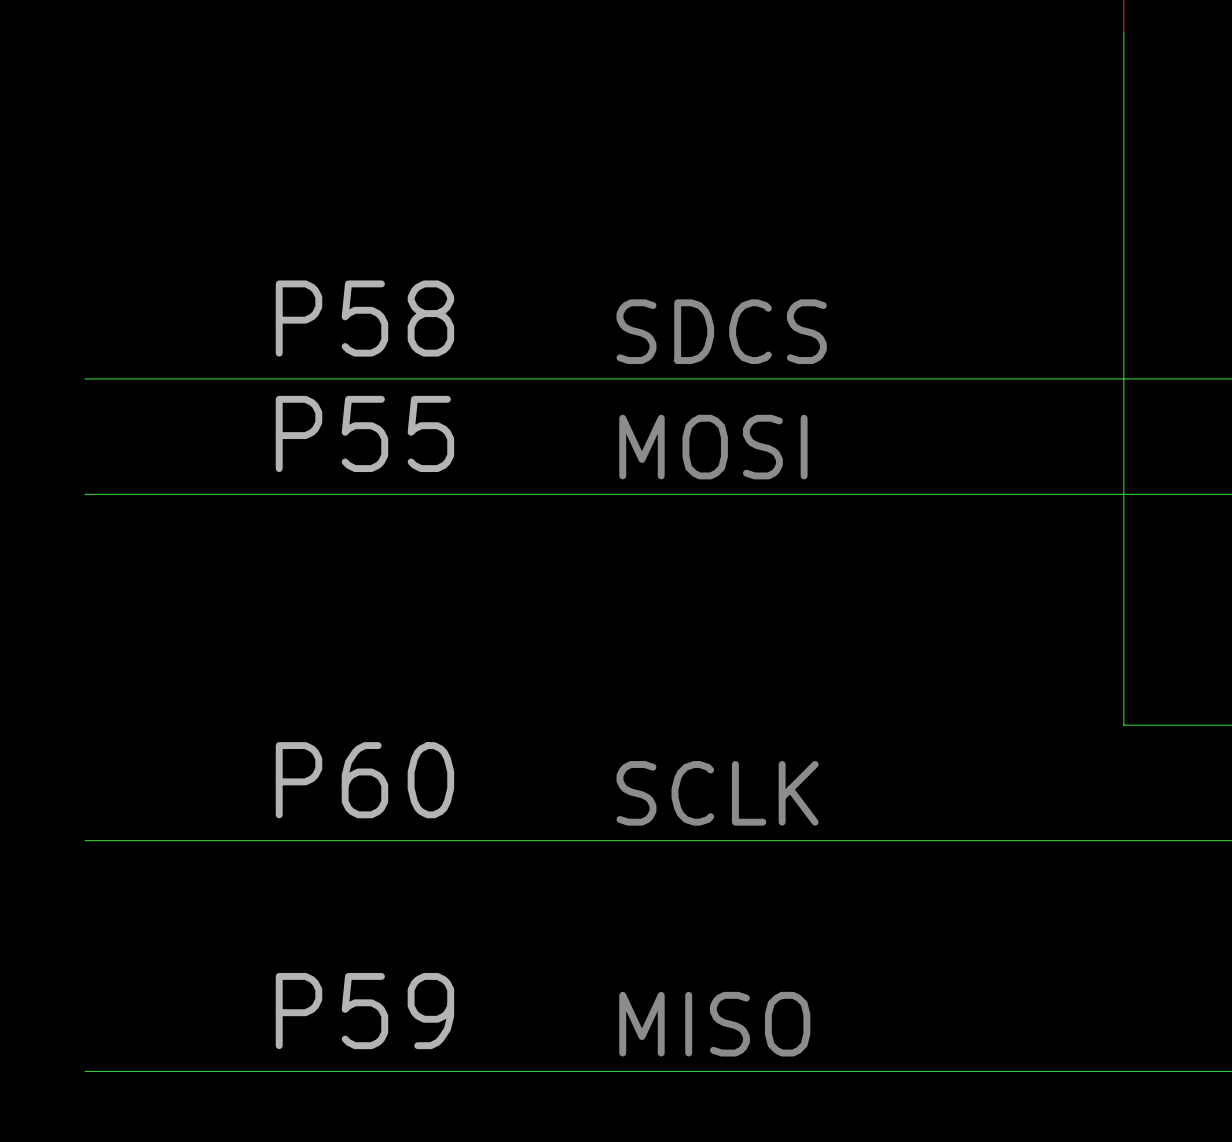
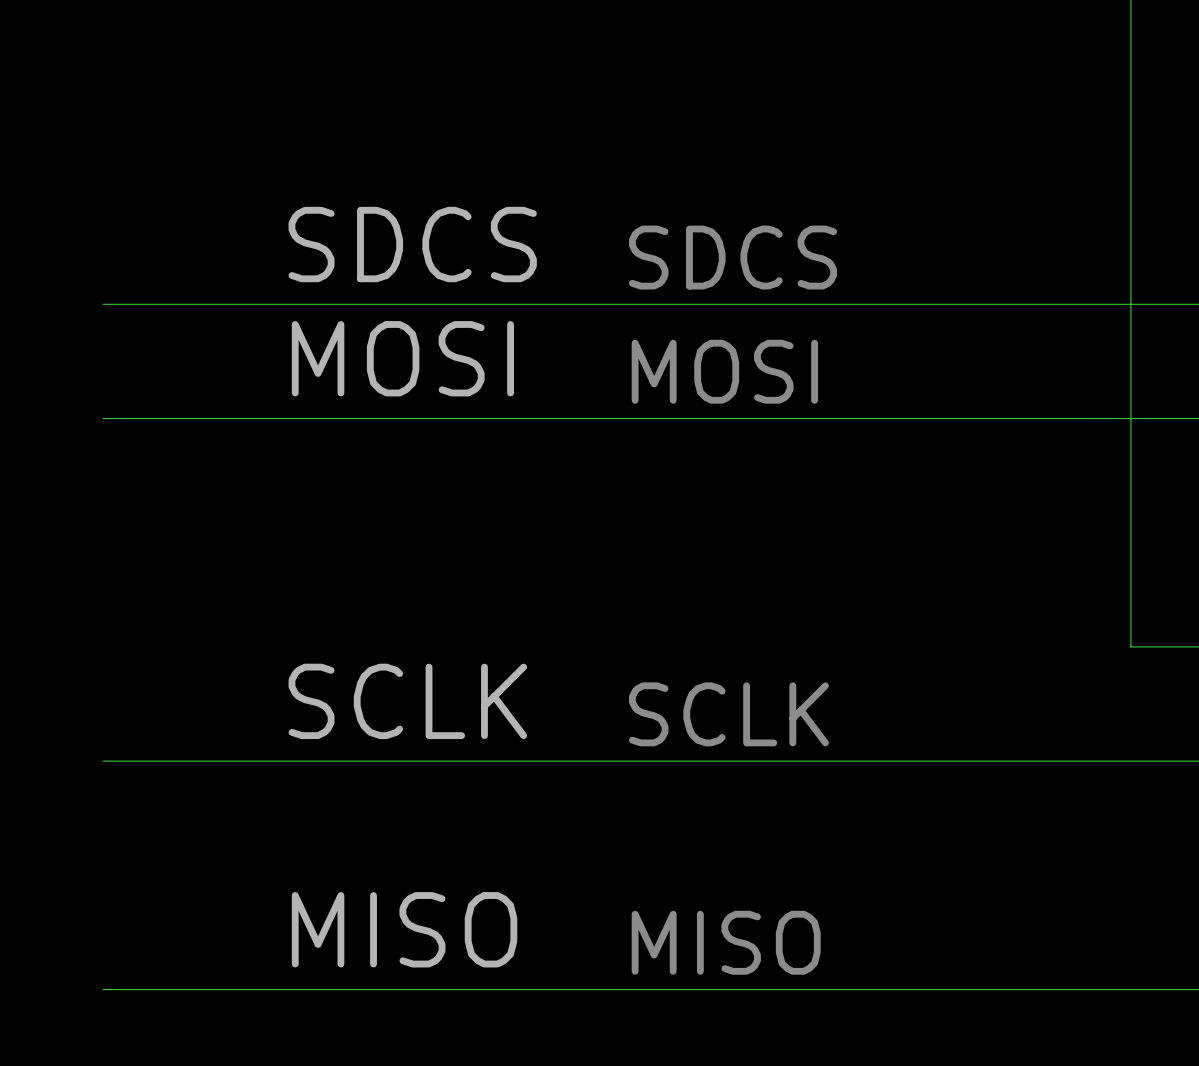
label: P58 (364, 318) -> SDCS (412, 244)
label: P55 (364, 433) -> MOSI (402, 358)
label: P60 (364, 780) -> SCLK (407, 701)
label: P59 (364, 1011) -> MISO (404, 929)

